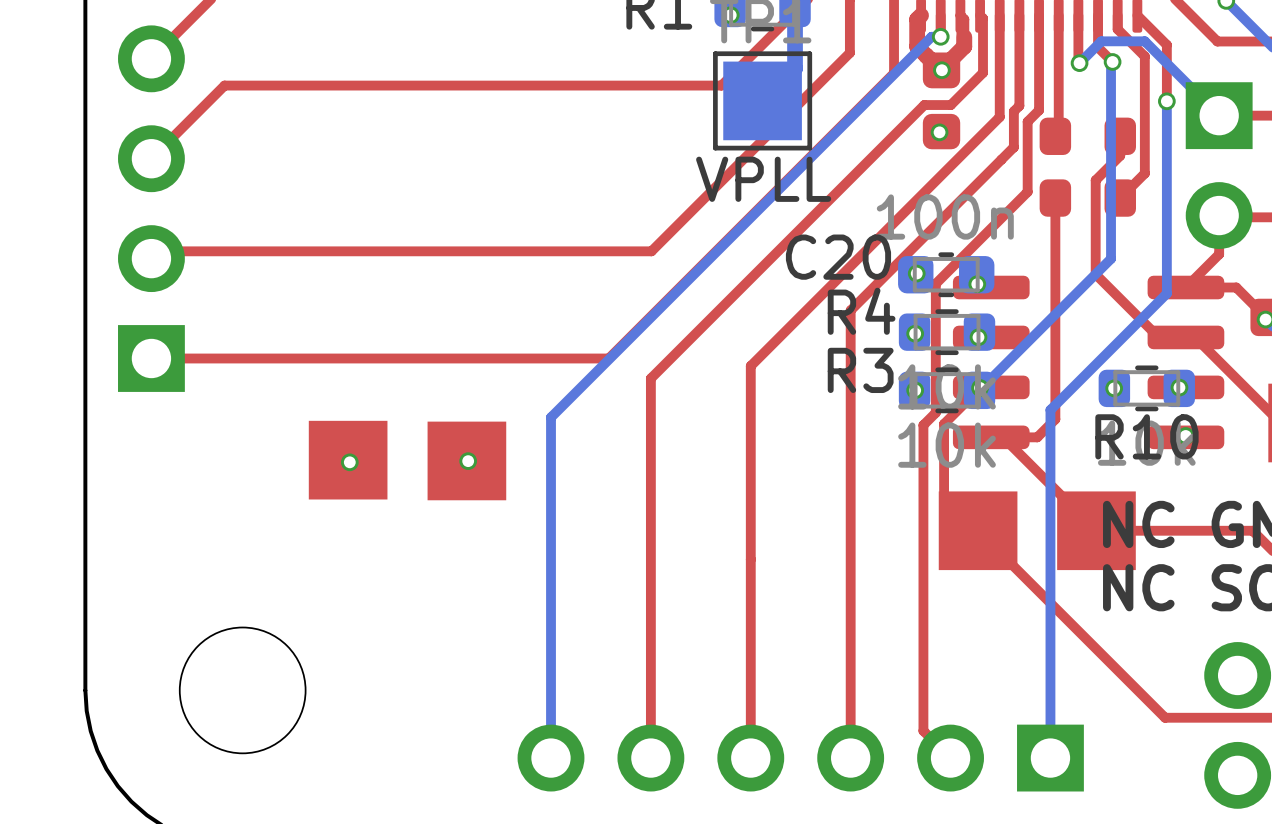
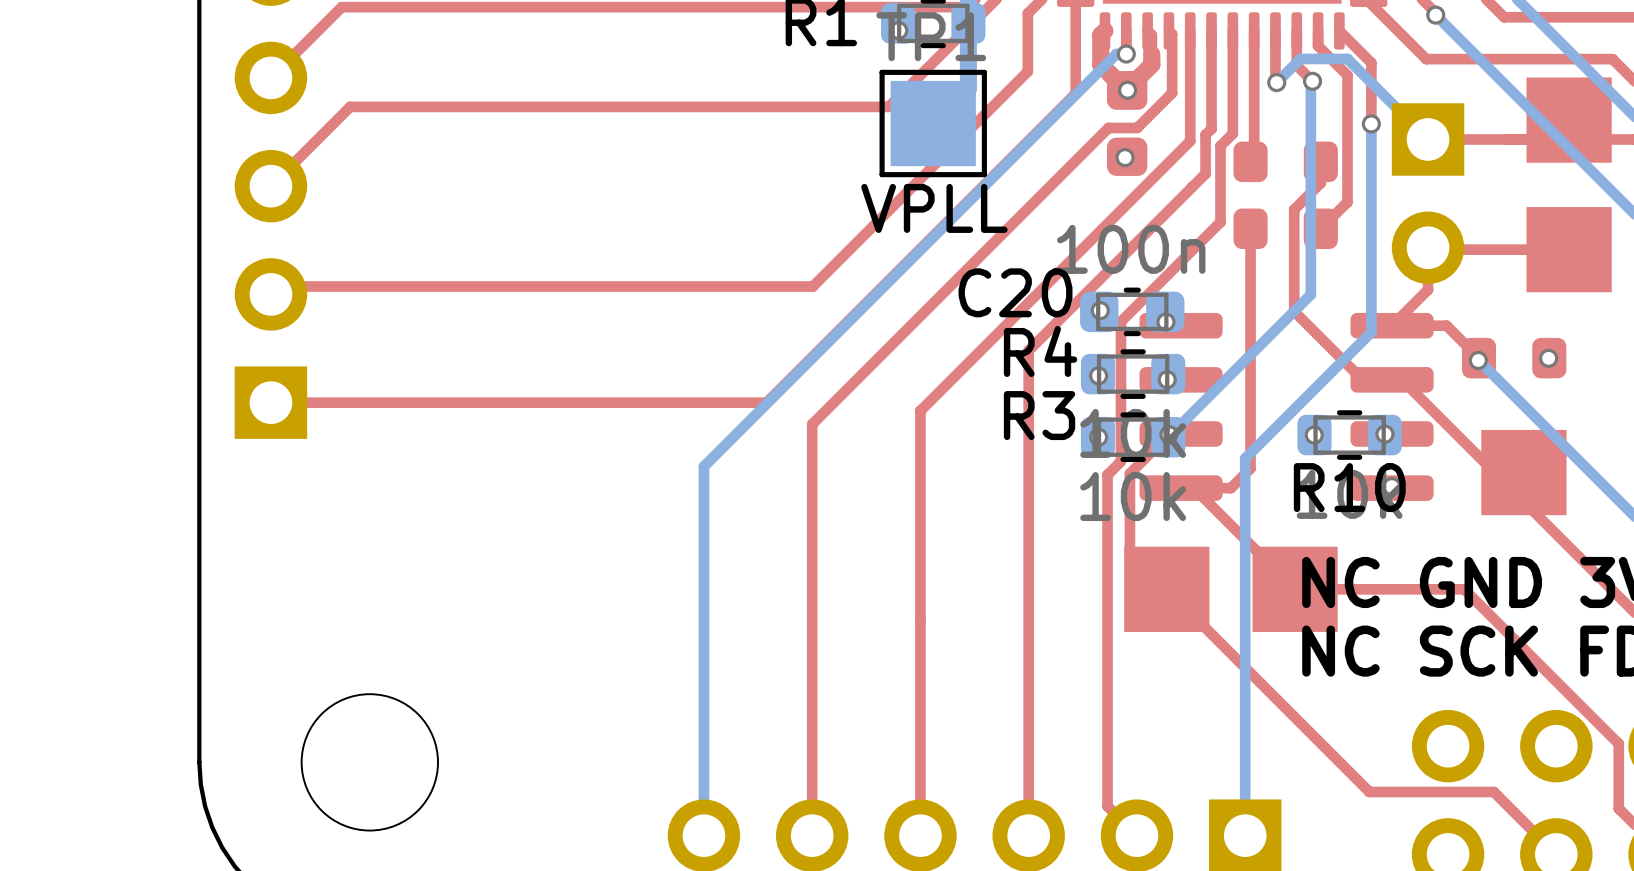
part: (348, 460) -> none
part: (466, 460) -> none
via: (468, 461) -> none
via: (349, 462) -> none

